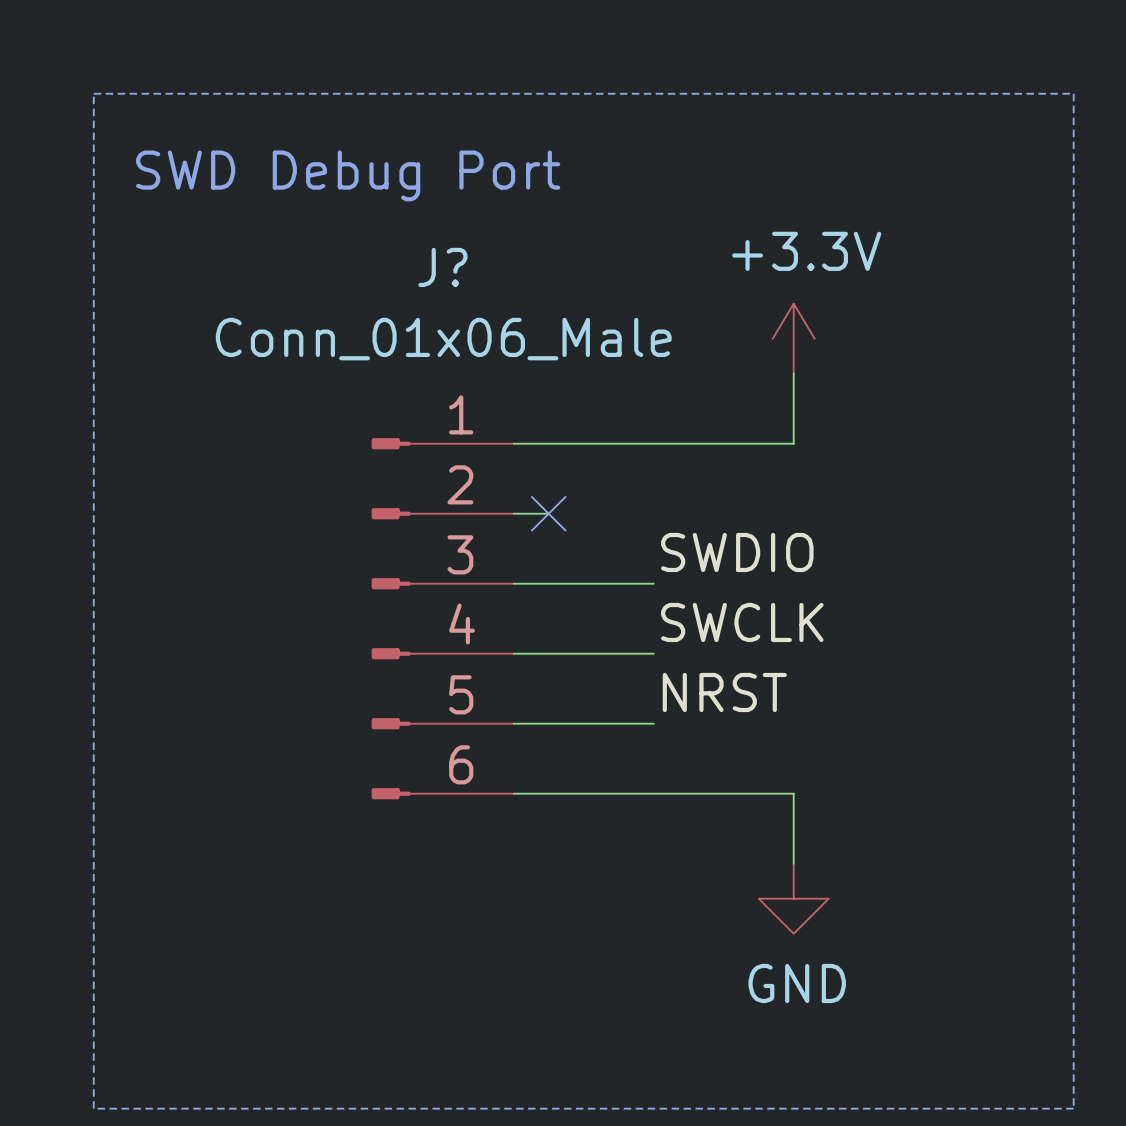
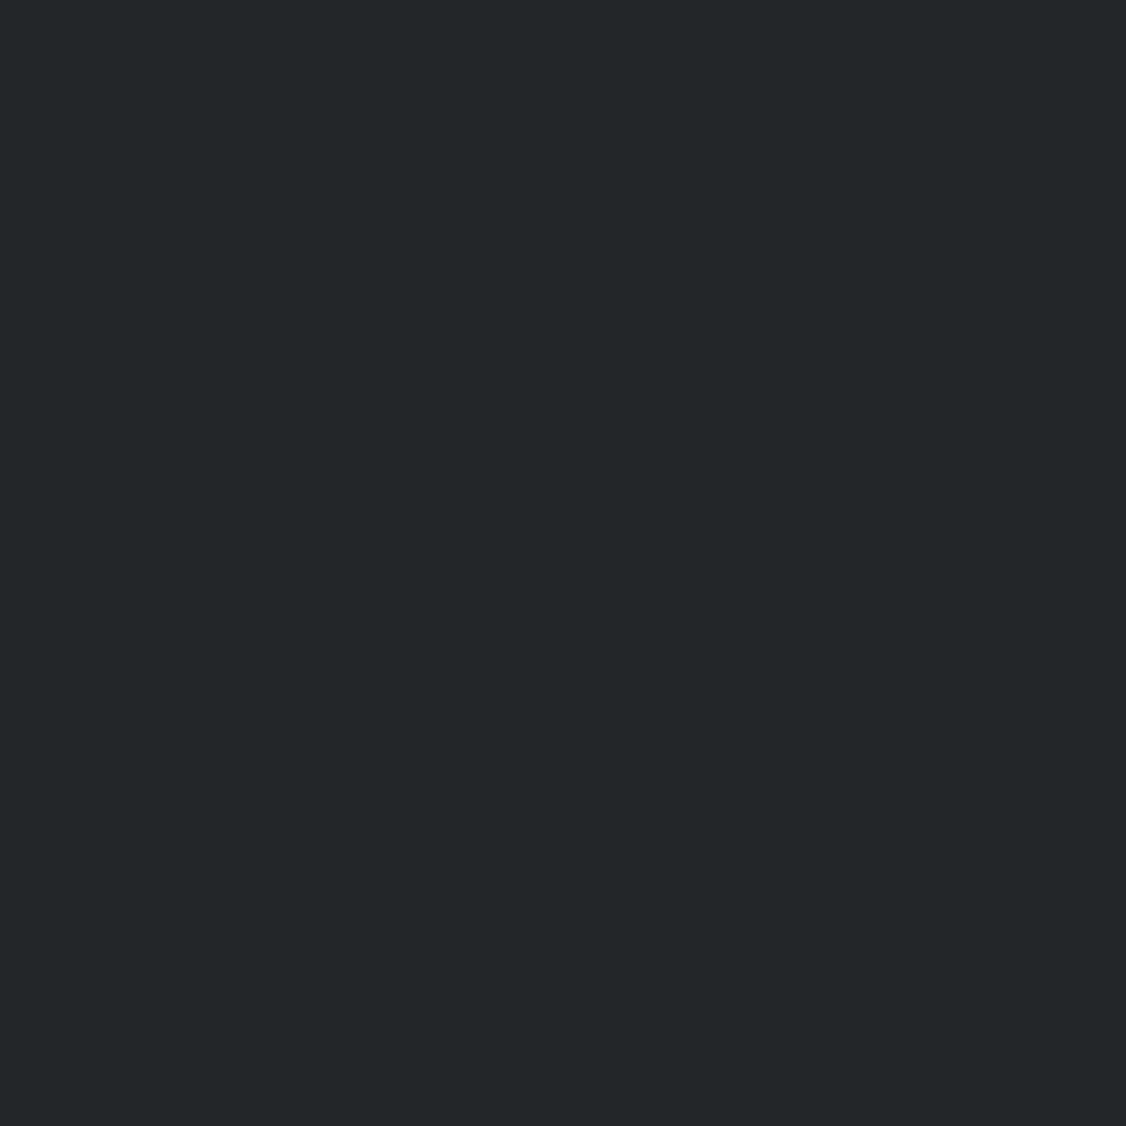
line: (93, 93) (1073, 93) (1073, 1108) (93, 1108) (93, 93) -> none
text: SWD Debug Port (348, 175) -> none
power symbol: +3.3V (793, 338) -> none
wire: (793, 373) (793, 443) (513, 443) -> none
wire: (513, 513) (548, 513) -> none
no-connect mark: (548, 513) -> none
label: SWDIO (737, 552) -> none
wire: (513, 583) (653, 583) -> none
J?: Conn_01x06_Male (442, 618) -> none
label: SWCLK (742, 622) -> none
wire: (513, 653) (653, 653) -> none
label: NRST (724, 692) -> none
wire: (513, 723) (653, 723) -> none
wire: (513, 793) (793, 793) (793, 863) -> none
power symbol: GND (793, 898) -> none

